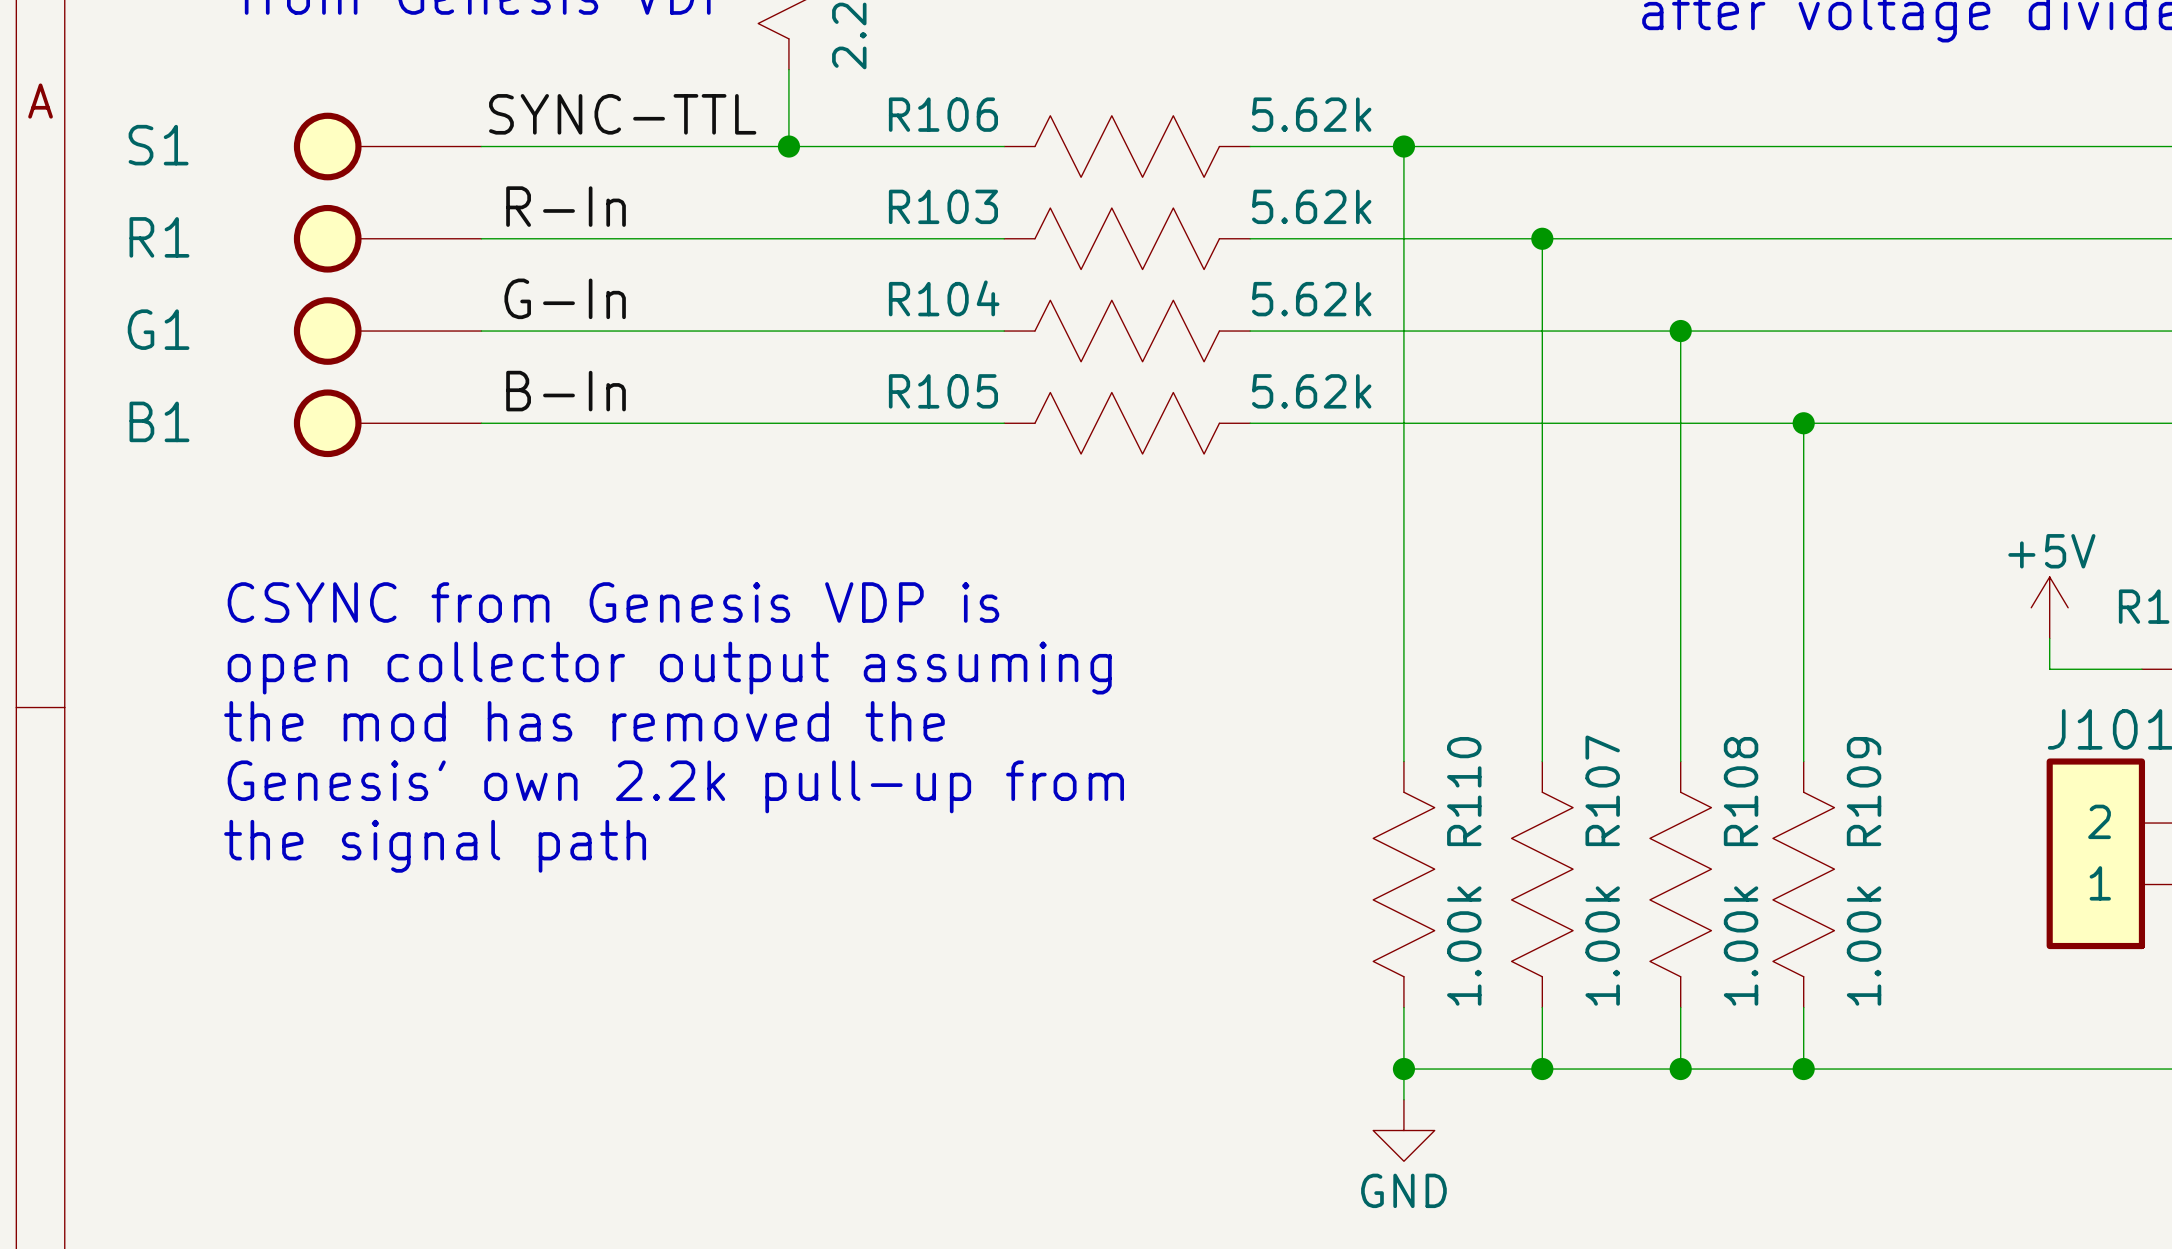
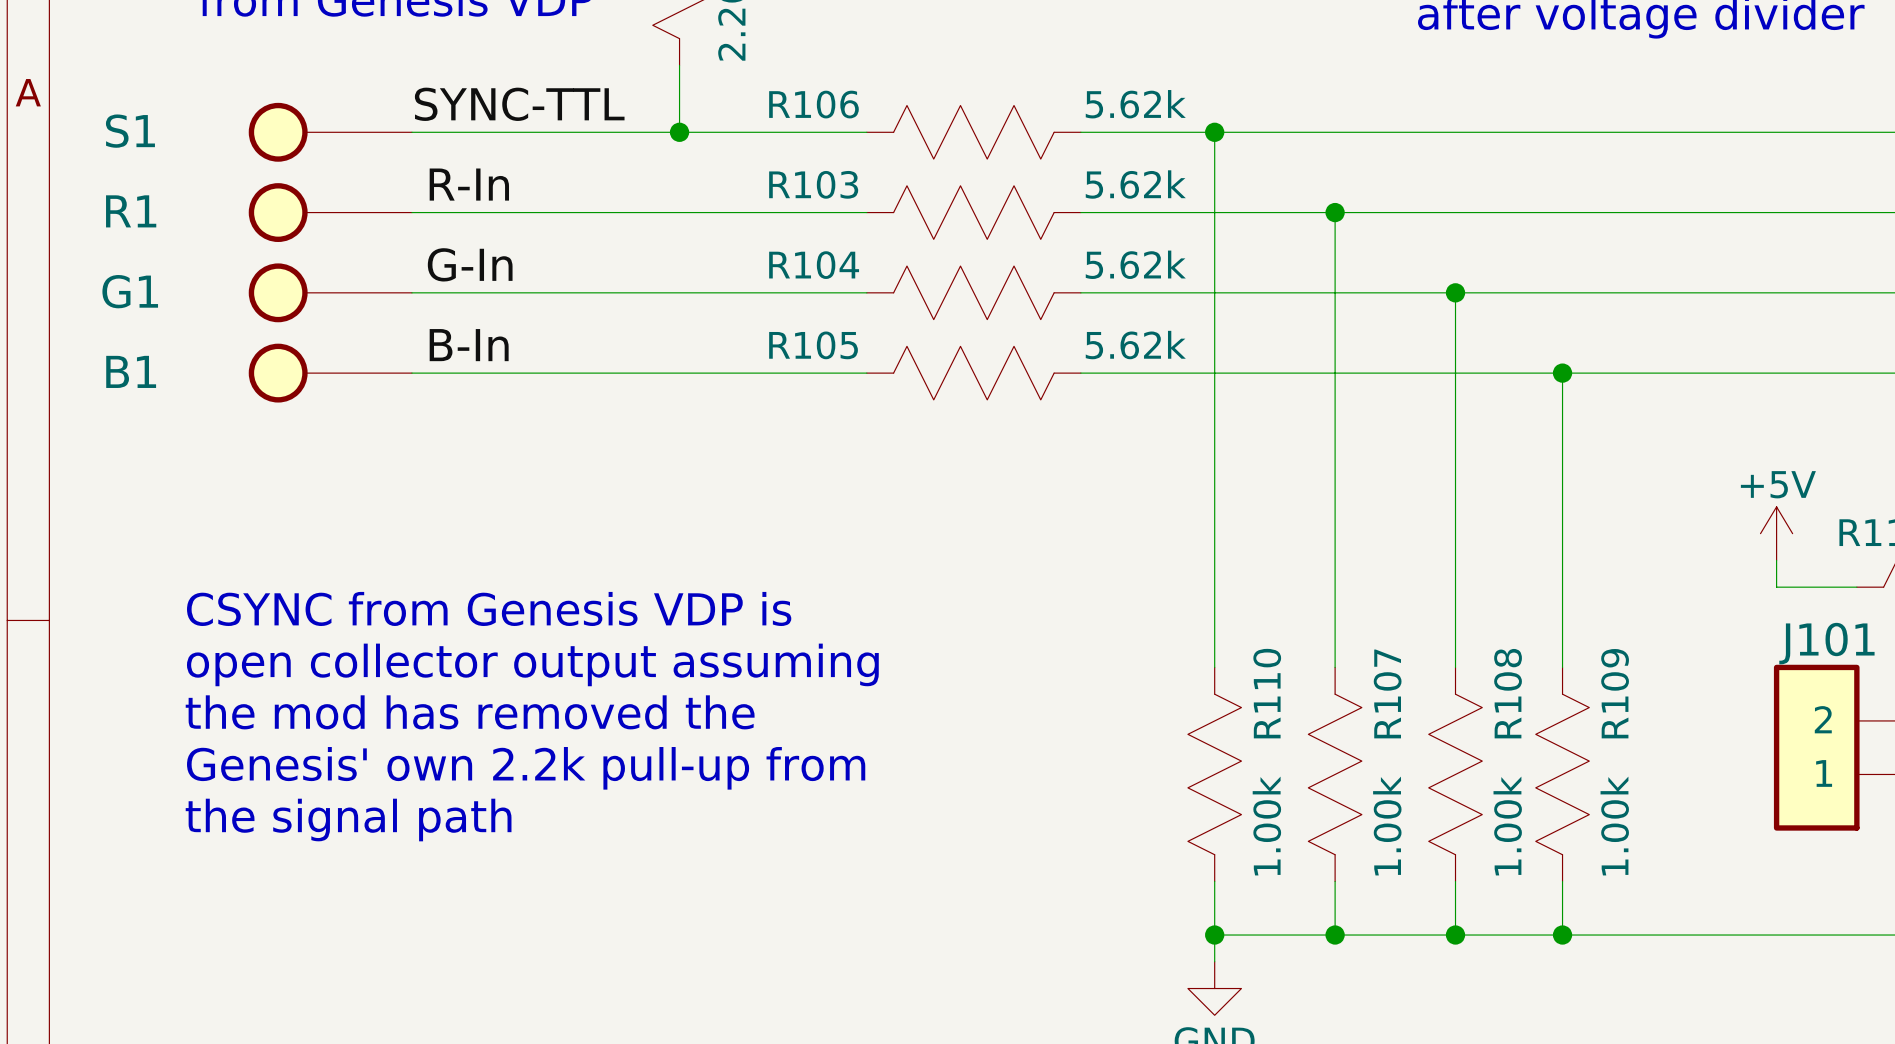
text position: CSYNC from Genesis VDP is (613, 602) -> CSYNC from Genesis VDP is (489, 608)
text position: open collector output assuming (669, 668) -> open collector output assuming (532, 664)
text position: the mod has removed the (584, 721) -> the mod has removed the (470, 712)
text position: Genesis' own 2.2k pull-up from (675, 786) -> Genesis' own 2.2k pull-up from (526, 768)
text position: the signal path (435, 846) -> the signal path (348, 820)

